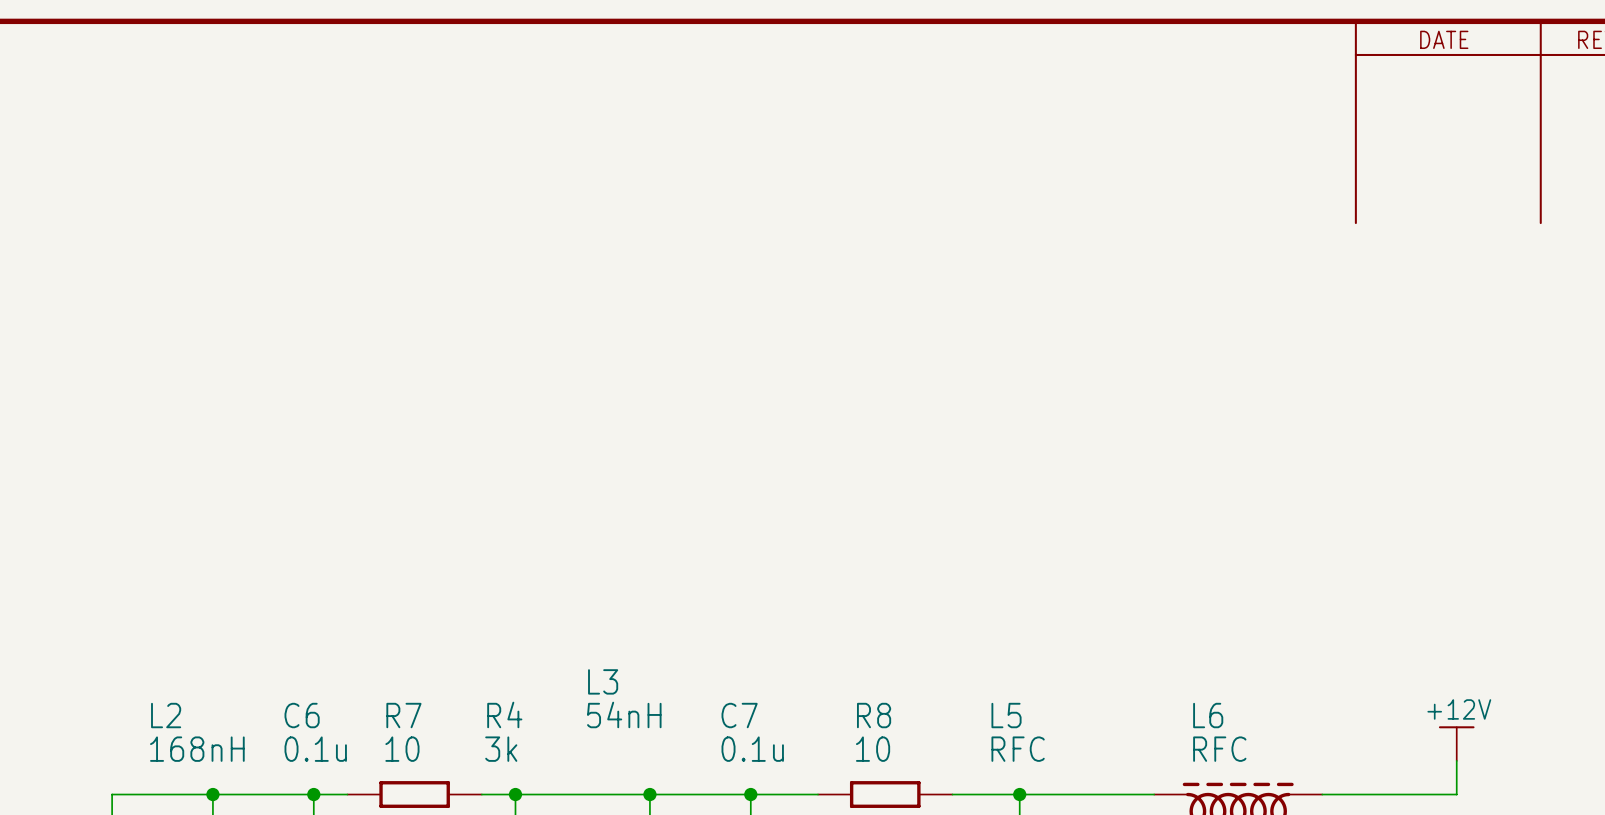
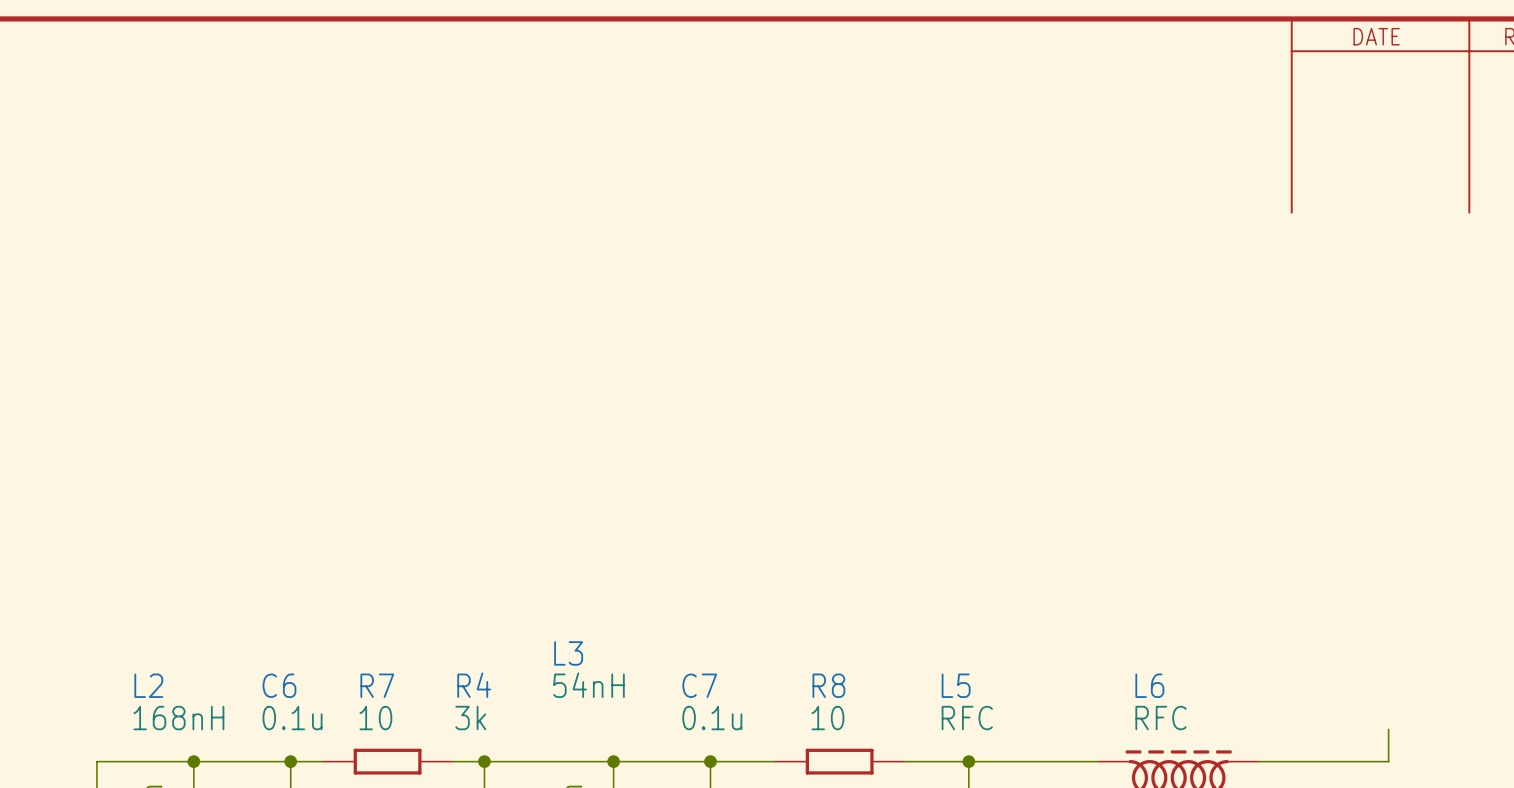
power symbol: +12V (1456, 743) -> none

